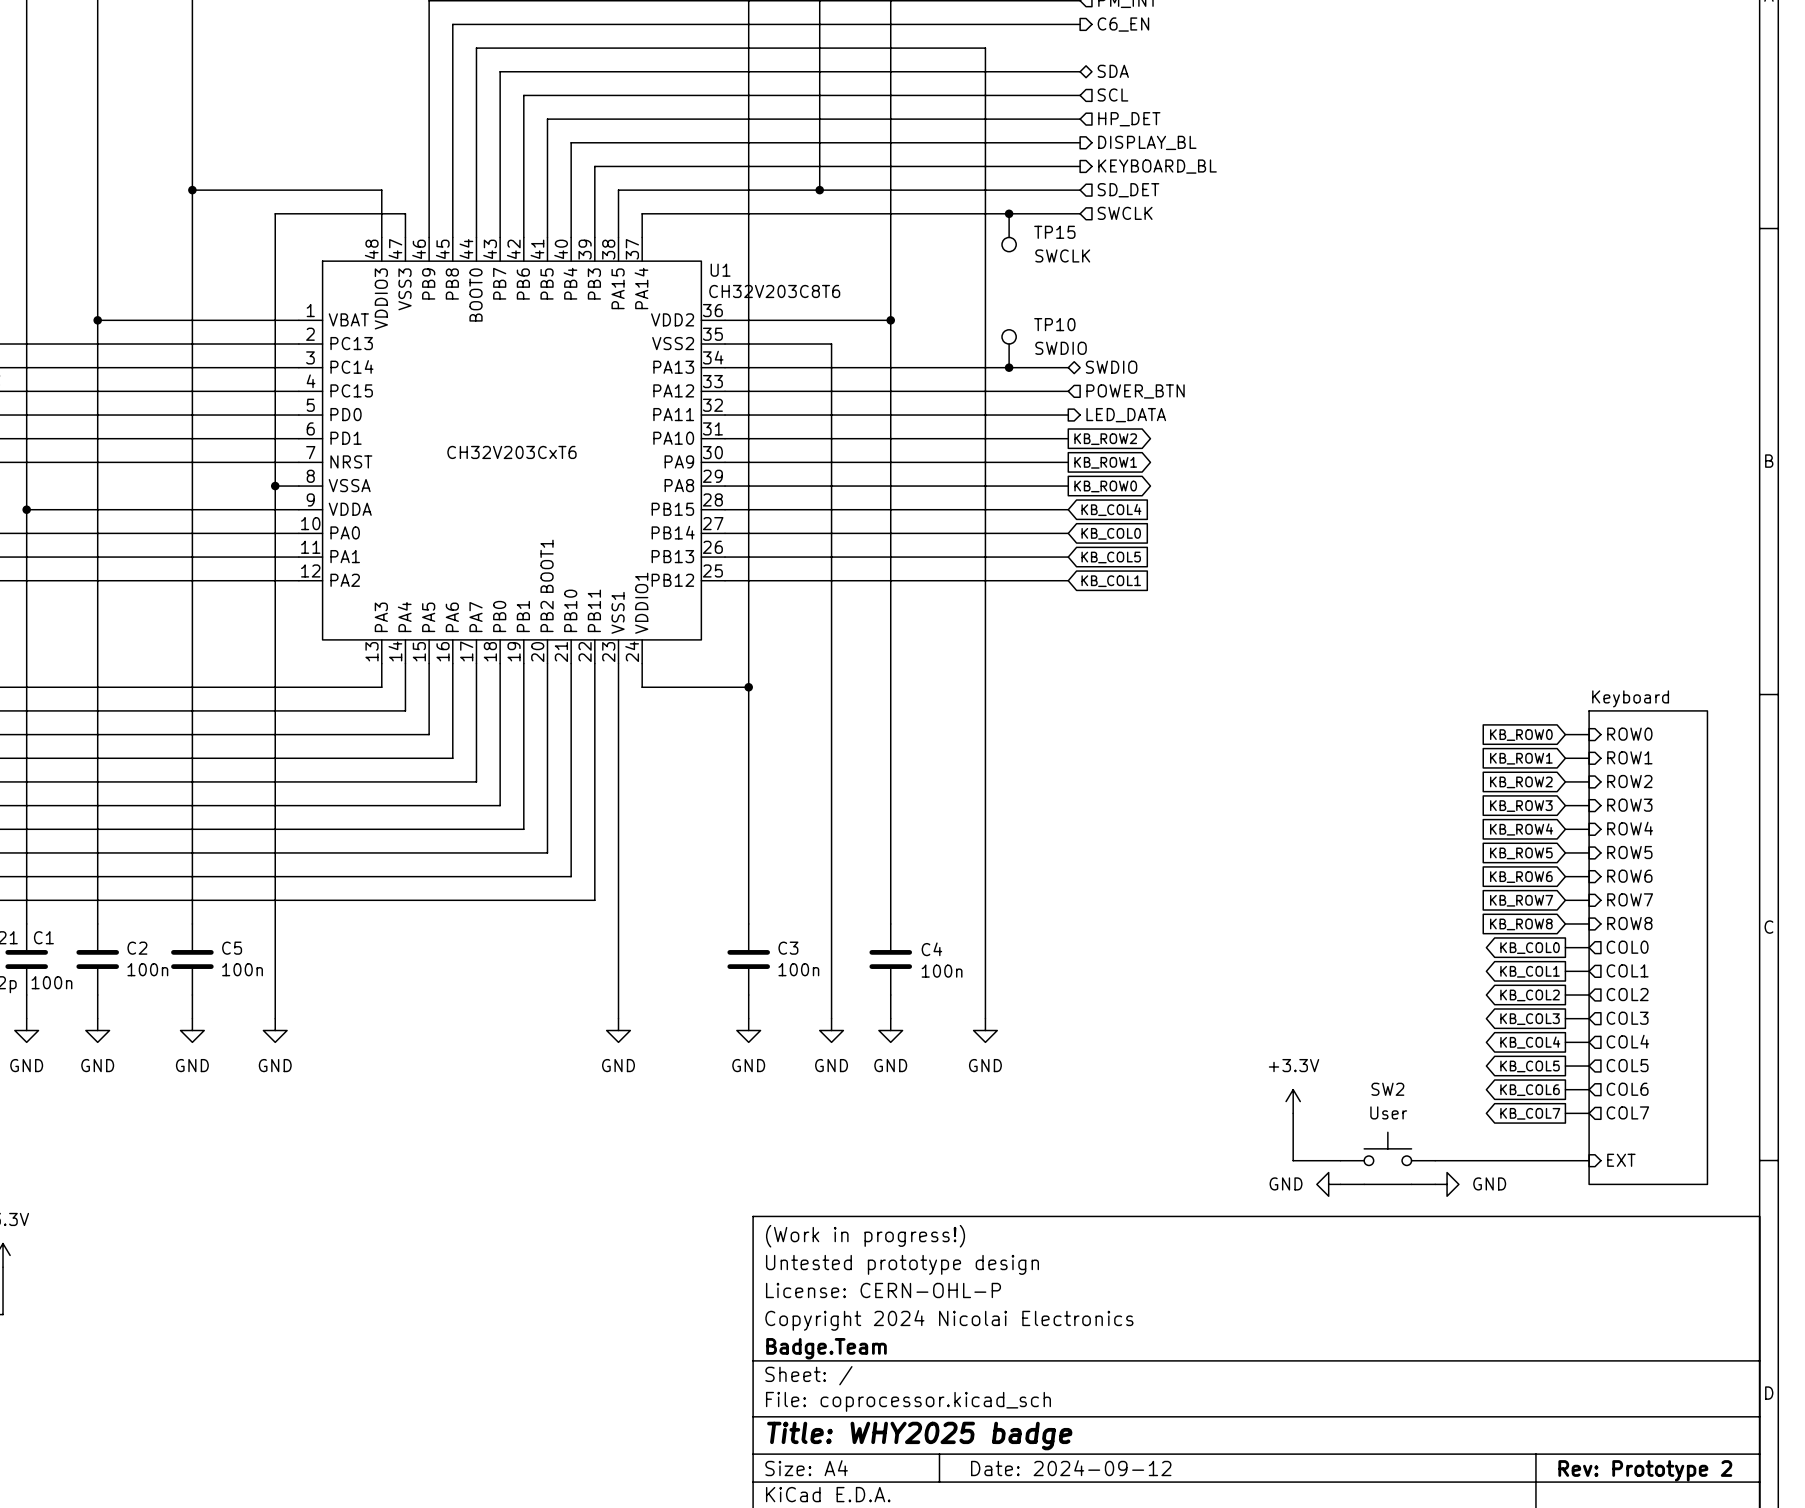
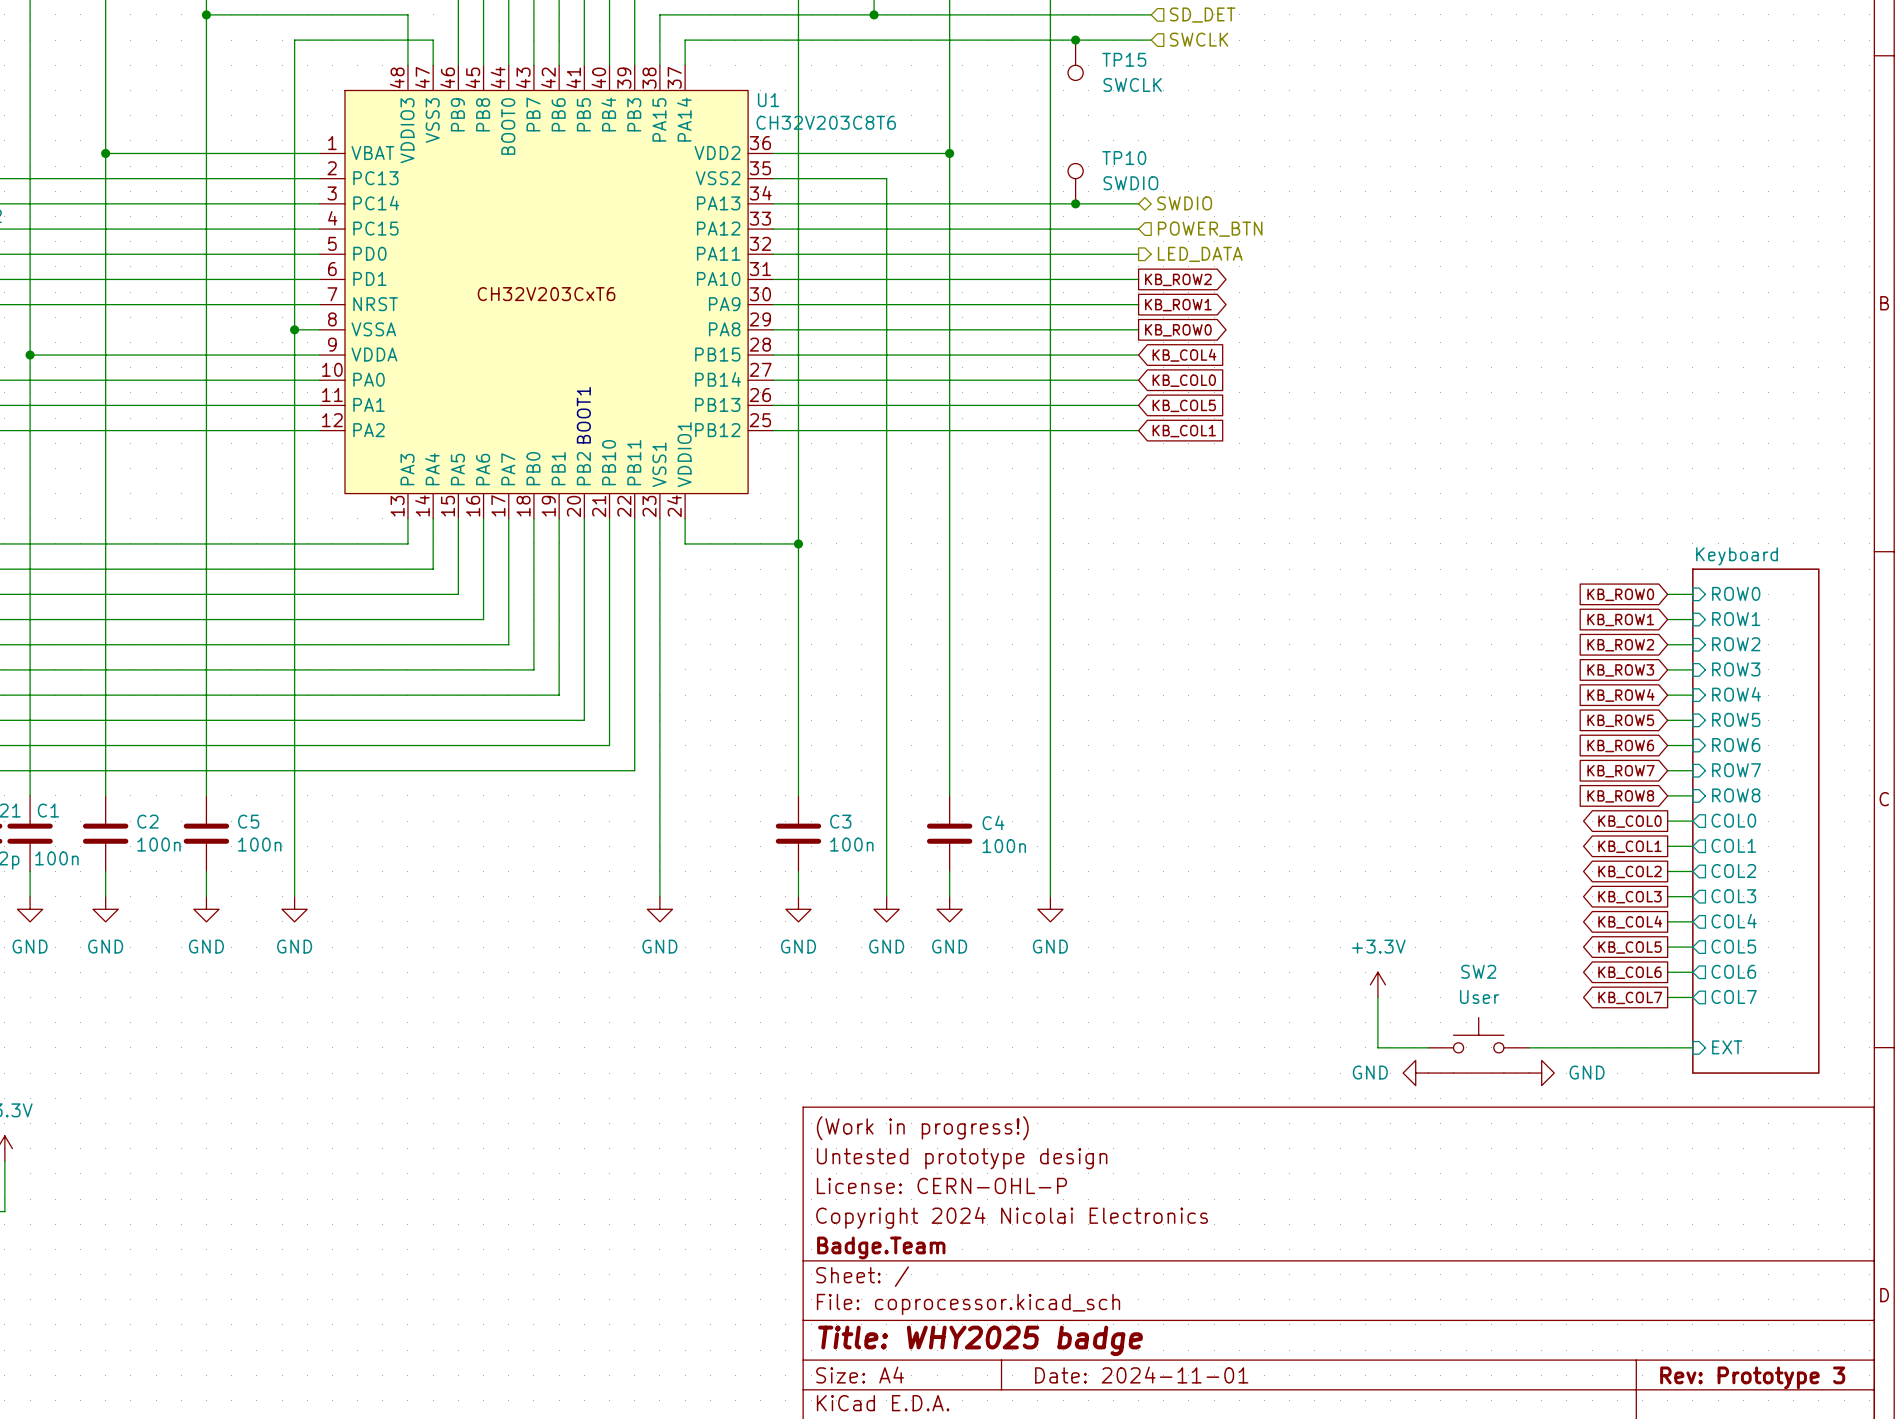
title block: Date: 2024-09-12 (1071, 1468) -> Date: 2024-11-01 (1141, 1375)
title block: Rev: Prototype 2 (1645, 1470) -> Rev: Prototype 3 (1752, 1377)

